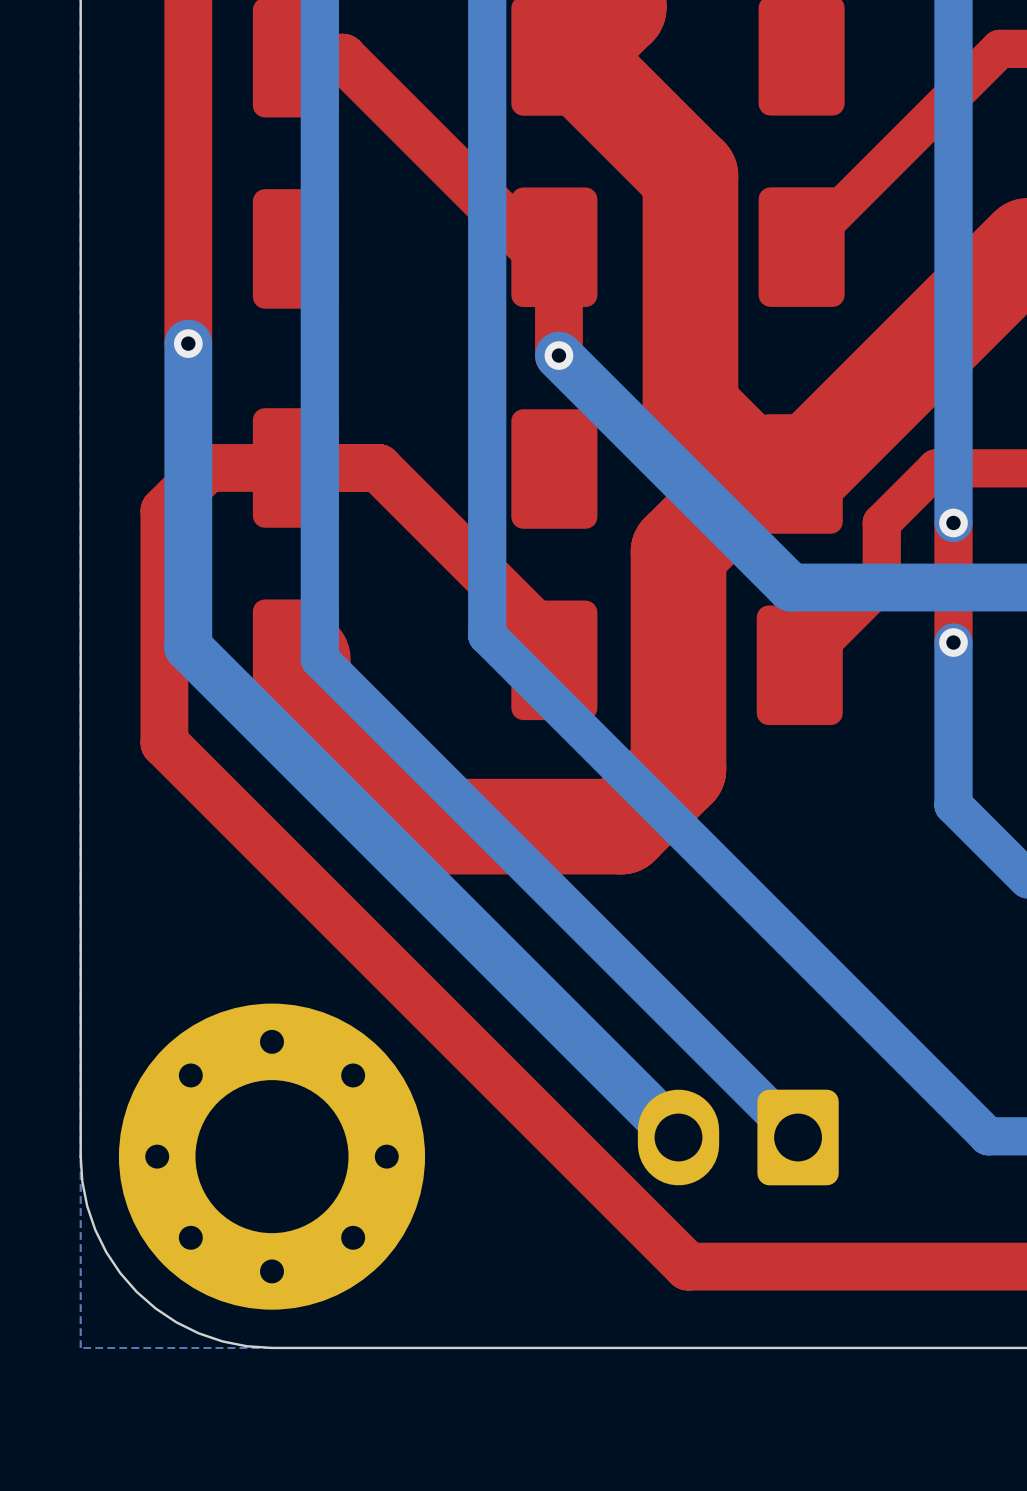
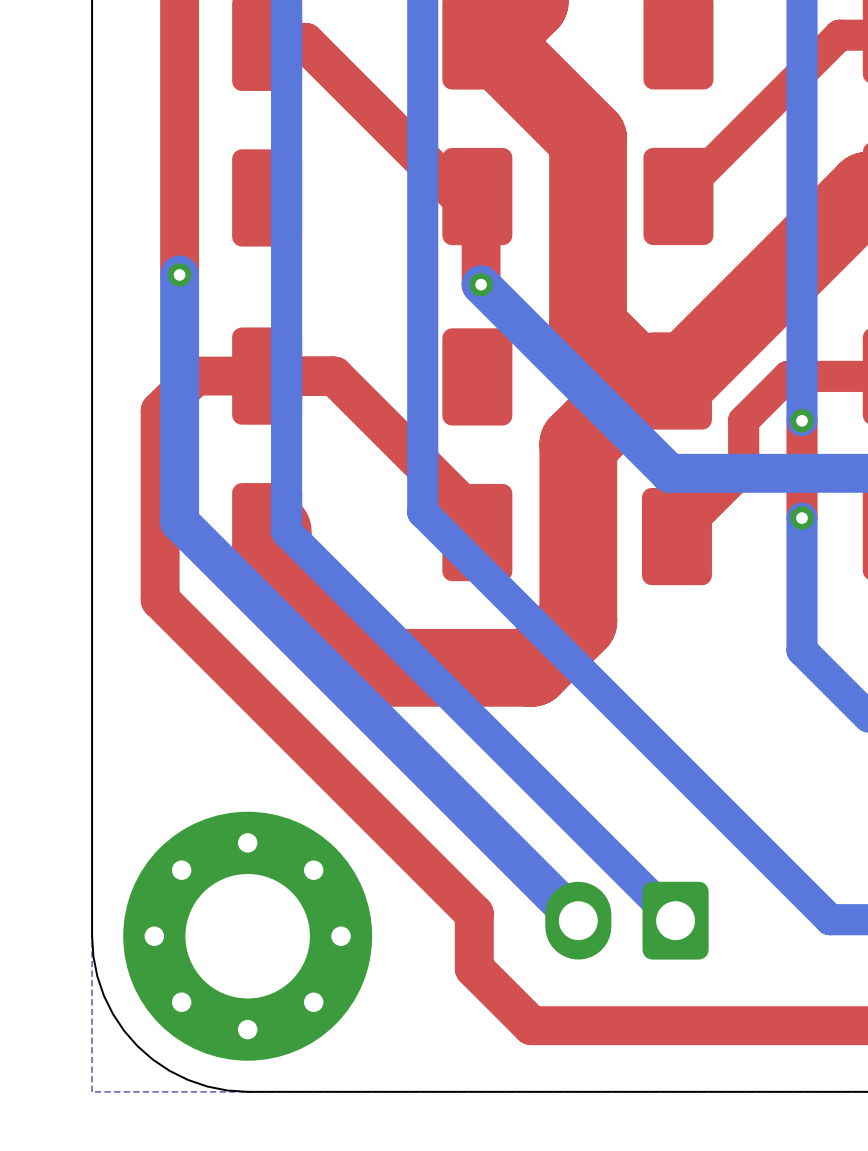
top track: (550, 1129) (688, 1266) -> (474, 913) (474, 968) (531, 1025) (586, 1025)

